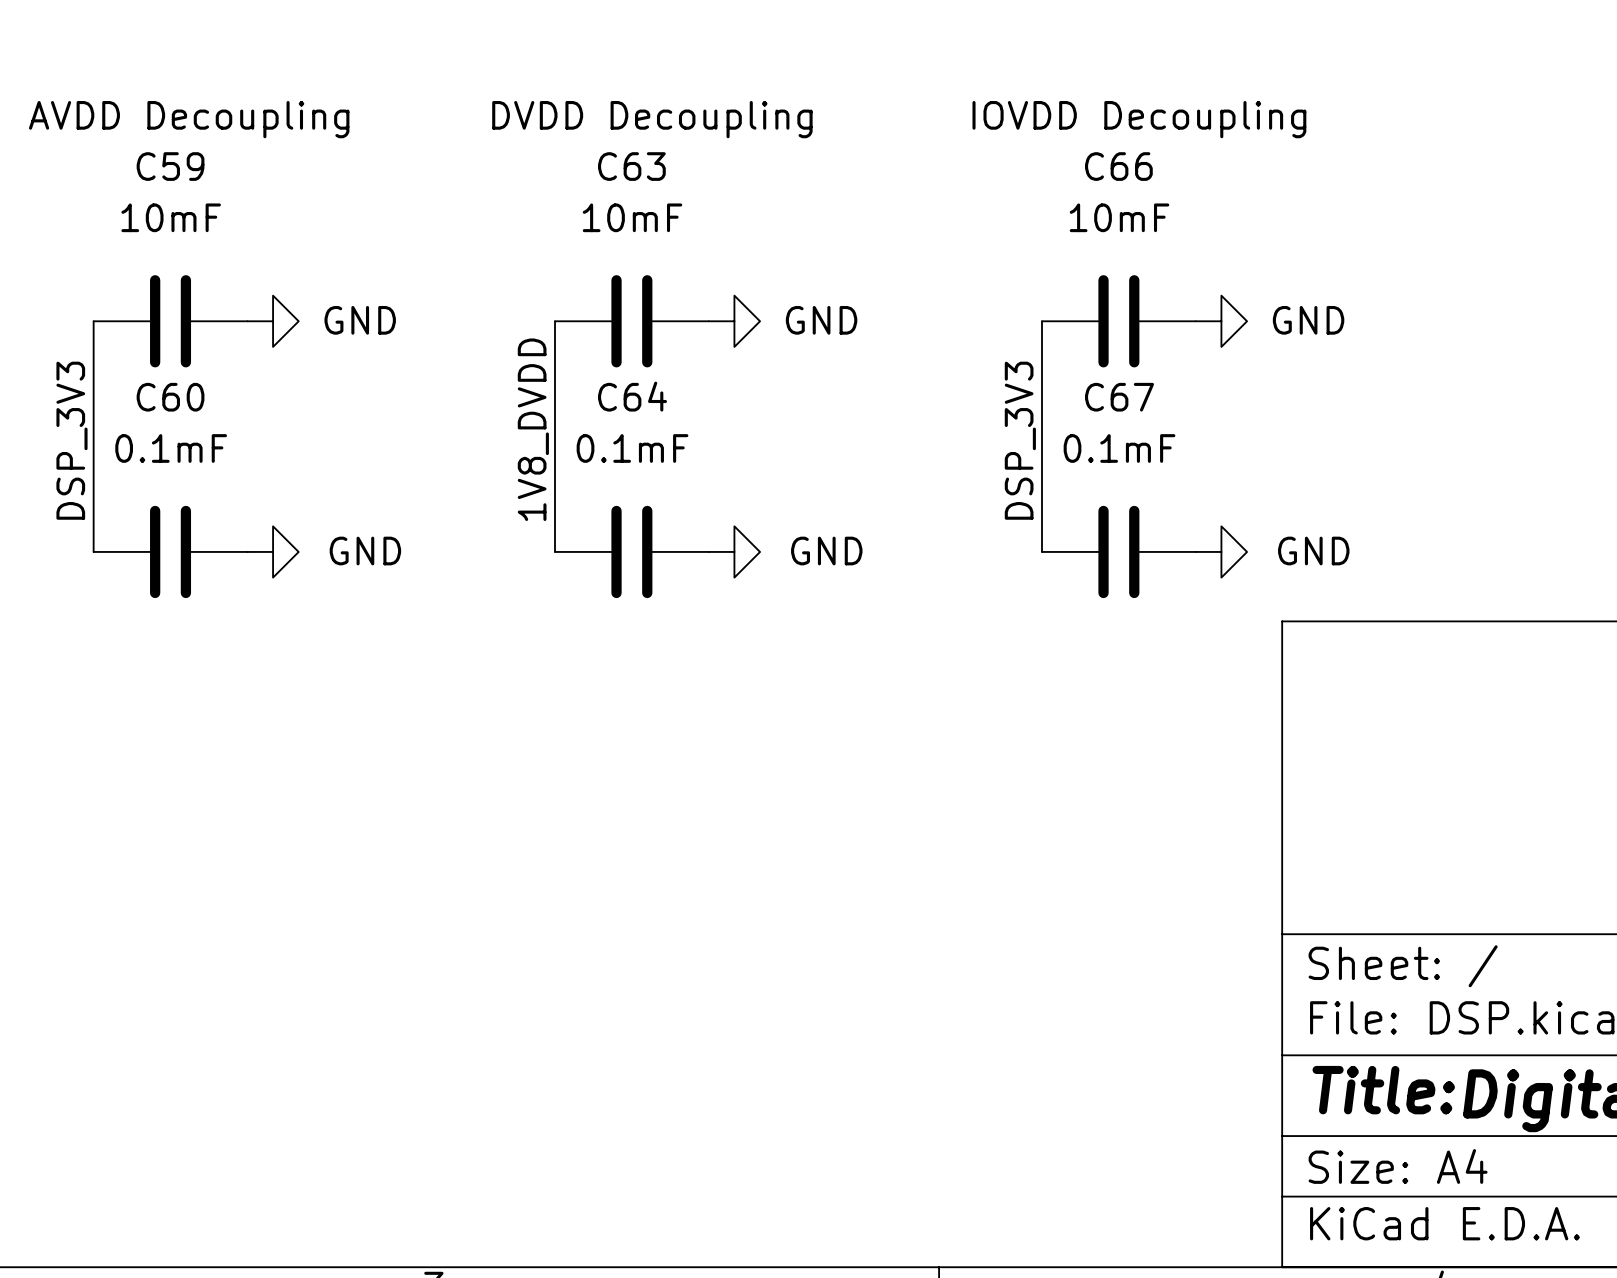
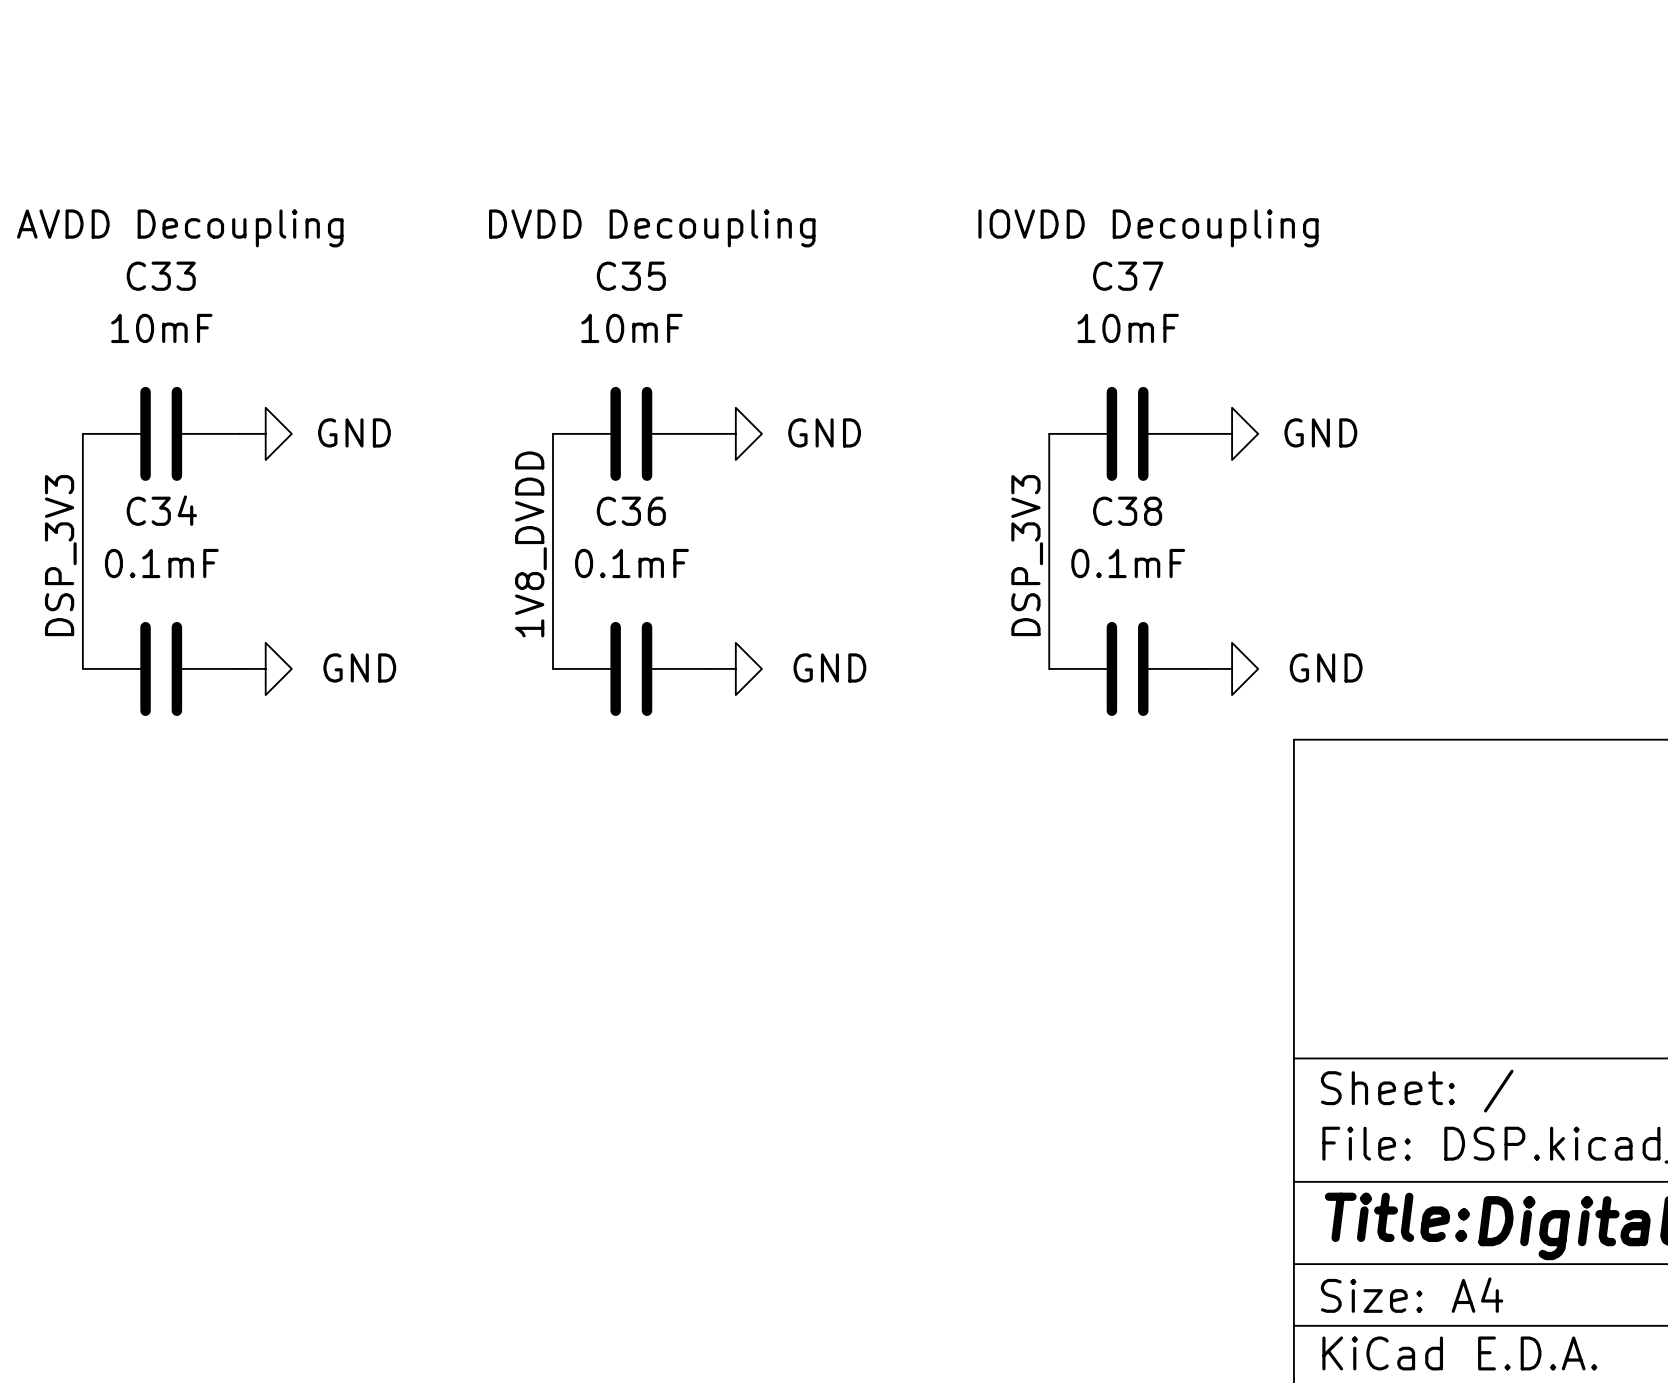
C59 name: C59 (170, 166) -> C33 (161, 276)
C63 name: C63 (631, 166) -> C35 (631, 276)
C66 name: C66 (1118, 166) -> C37 (1128, 276)
C64 name: C64 (632, 396) -> C36 (631, 511)
C60 name: C60 (170, 397) -> C34 (161, 510)
C67 name: C67 (1119, 397) -> C38 (1127, 511)

